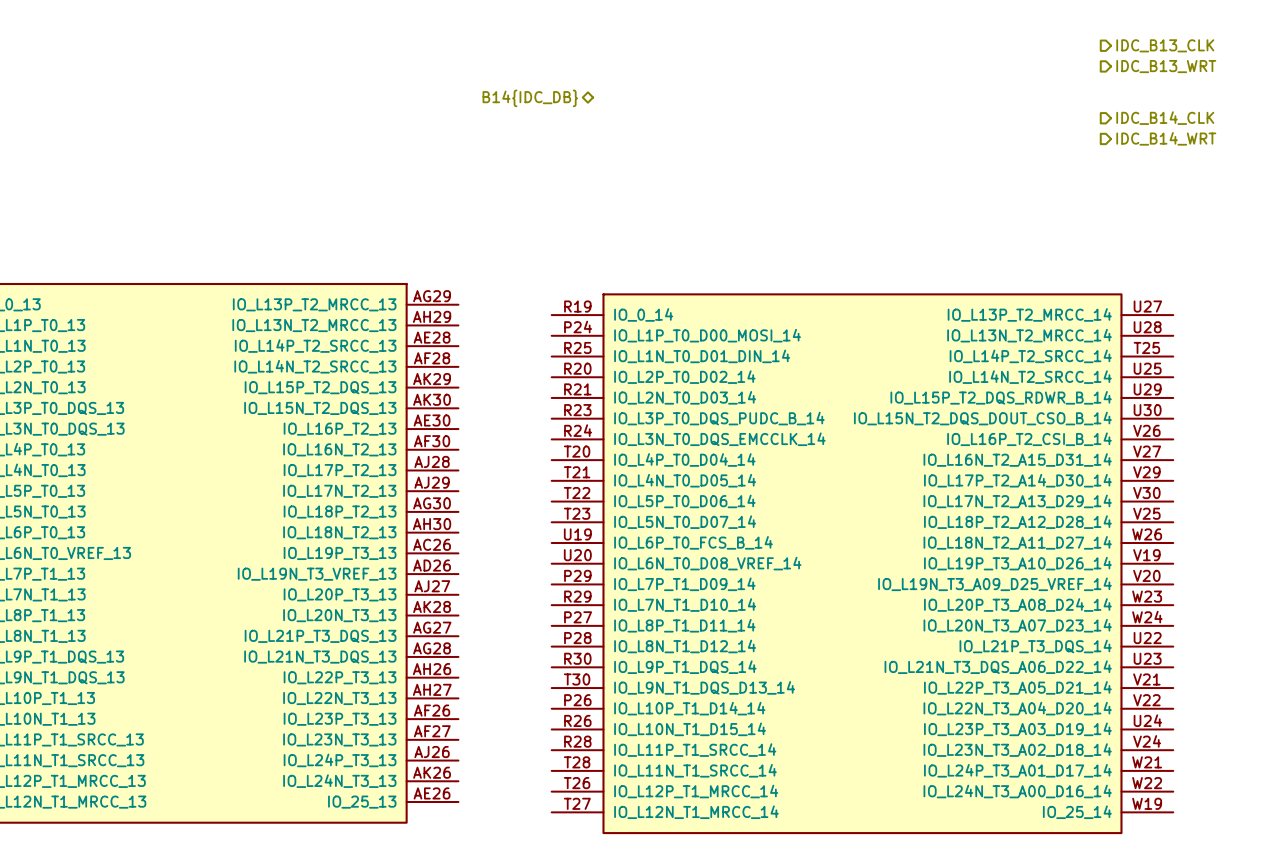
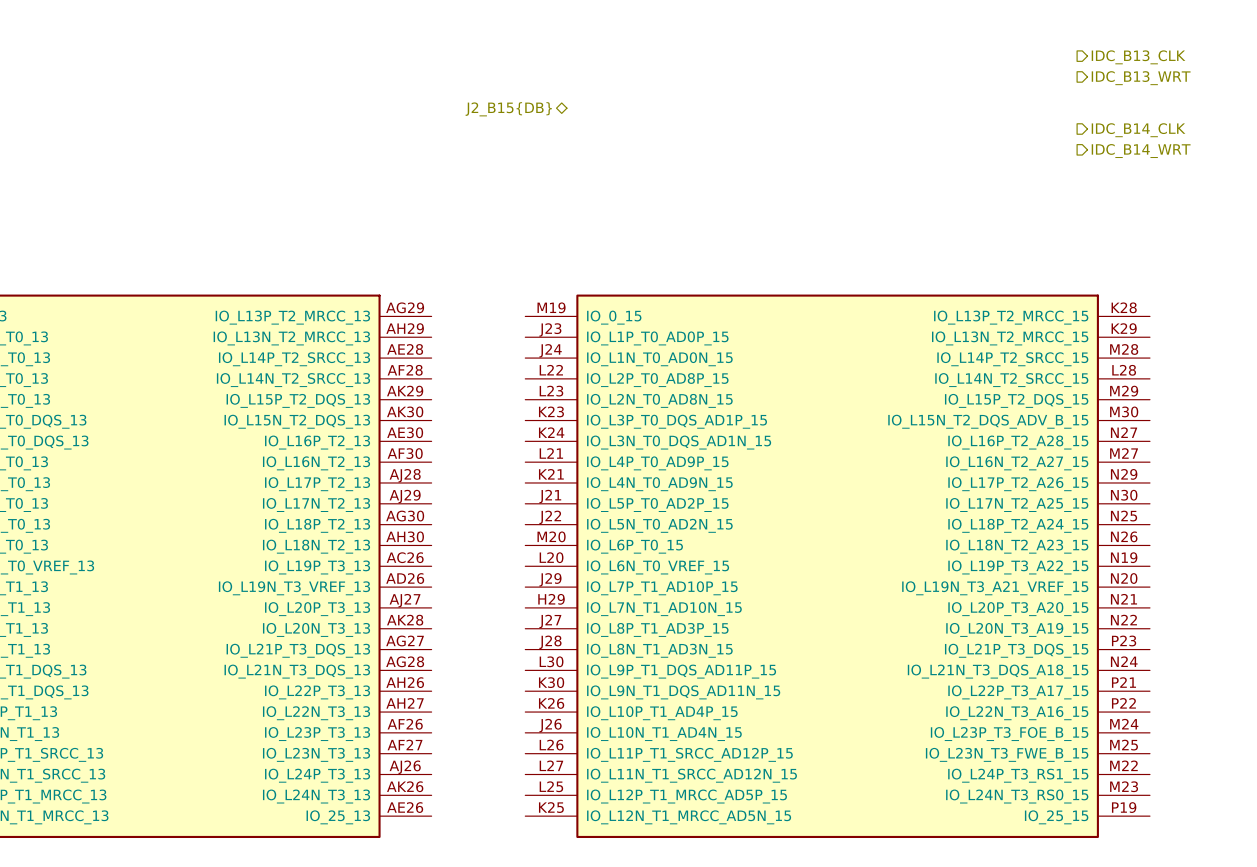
hierarchical label: B14{IDC_DB} (530, 98) -> J2_B15{DB} (508, 109)
part: none -> (837, 566)
part: (862, 563) -> none

